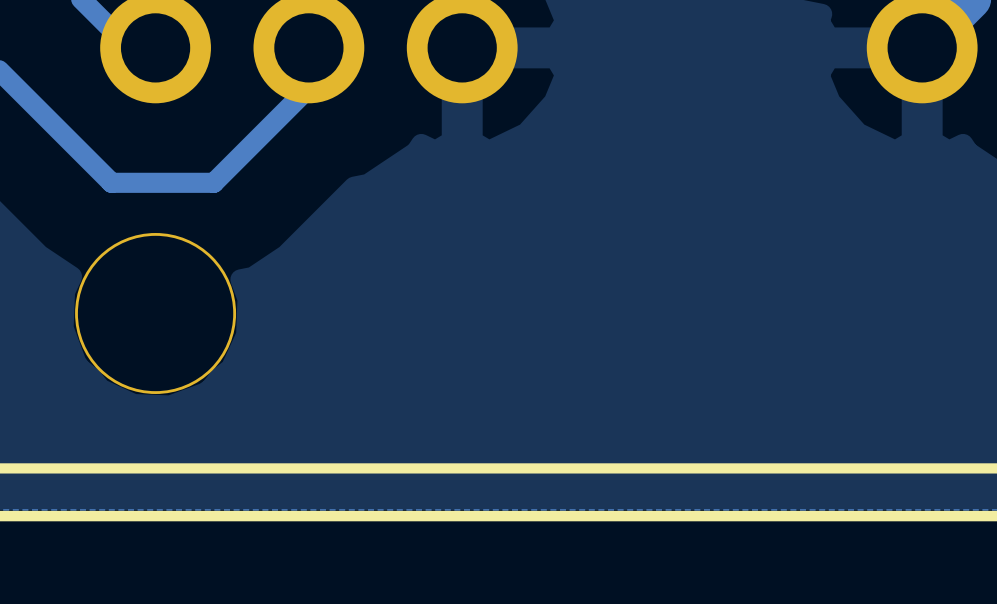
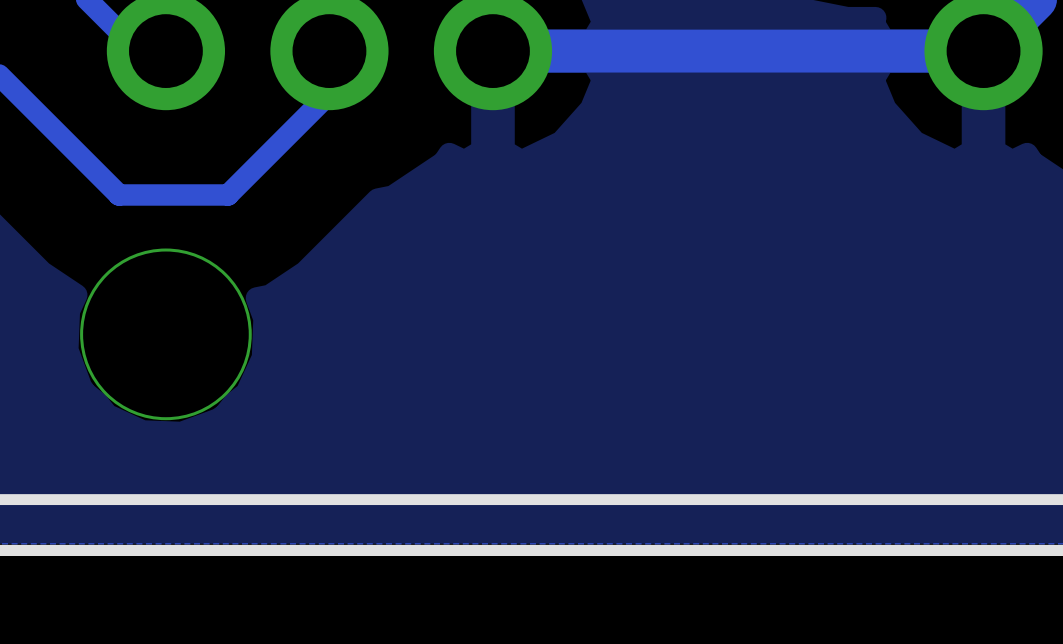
bottom track: none -> (492, 51) (983, 51)

